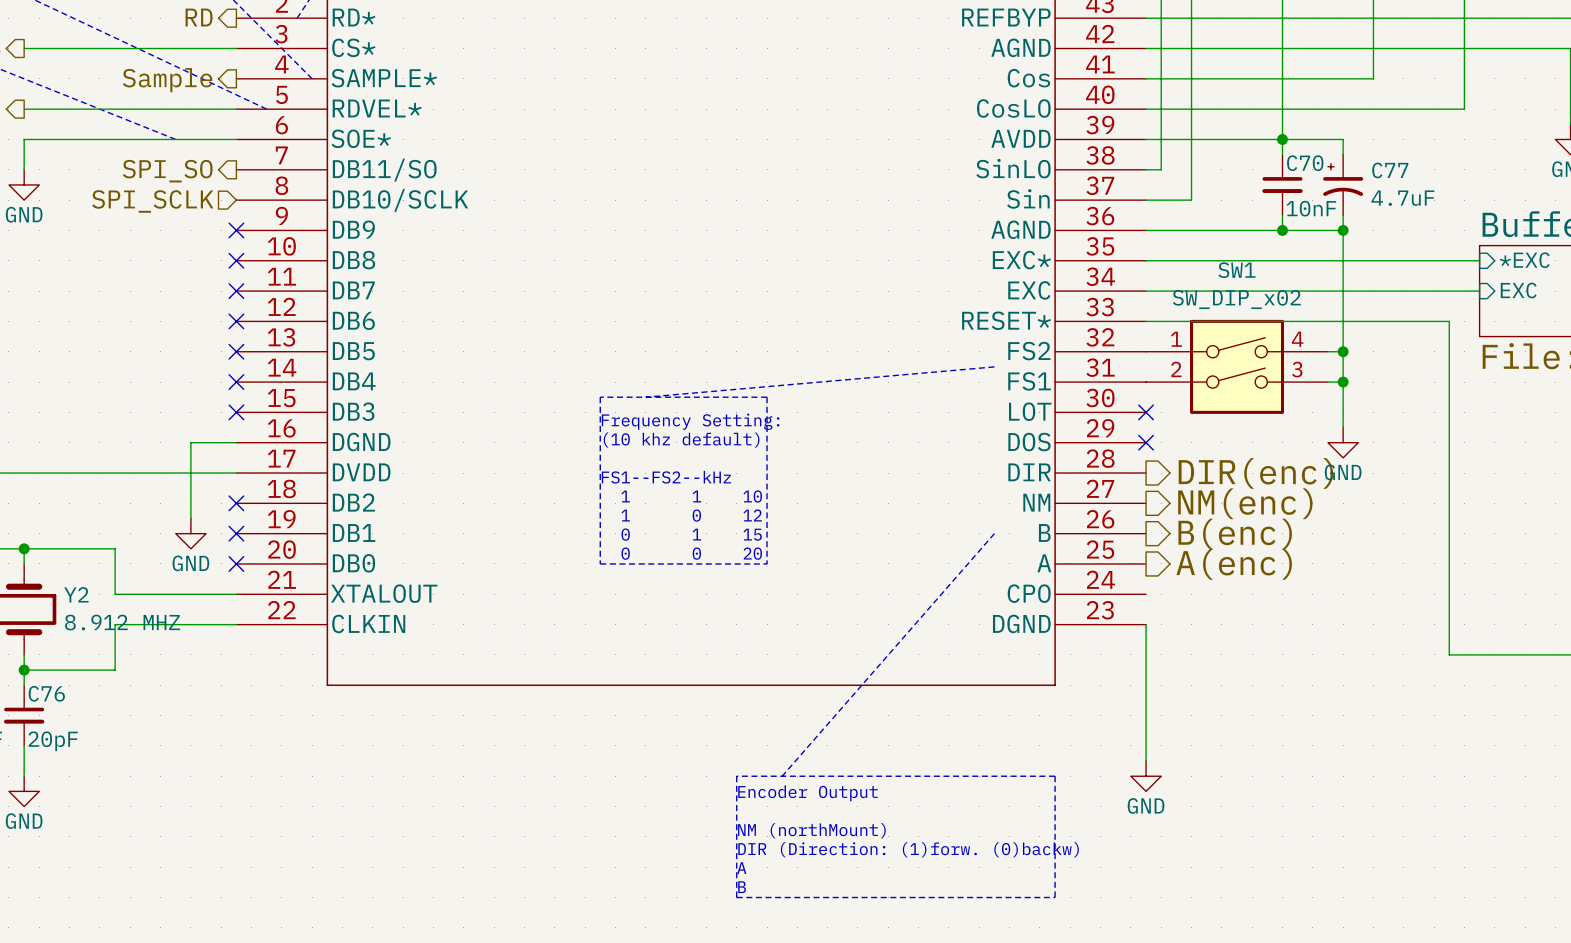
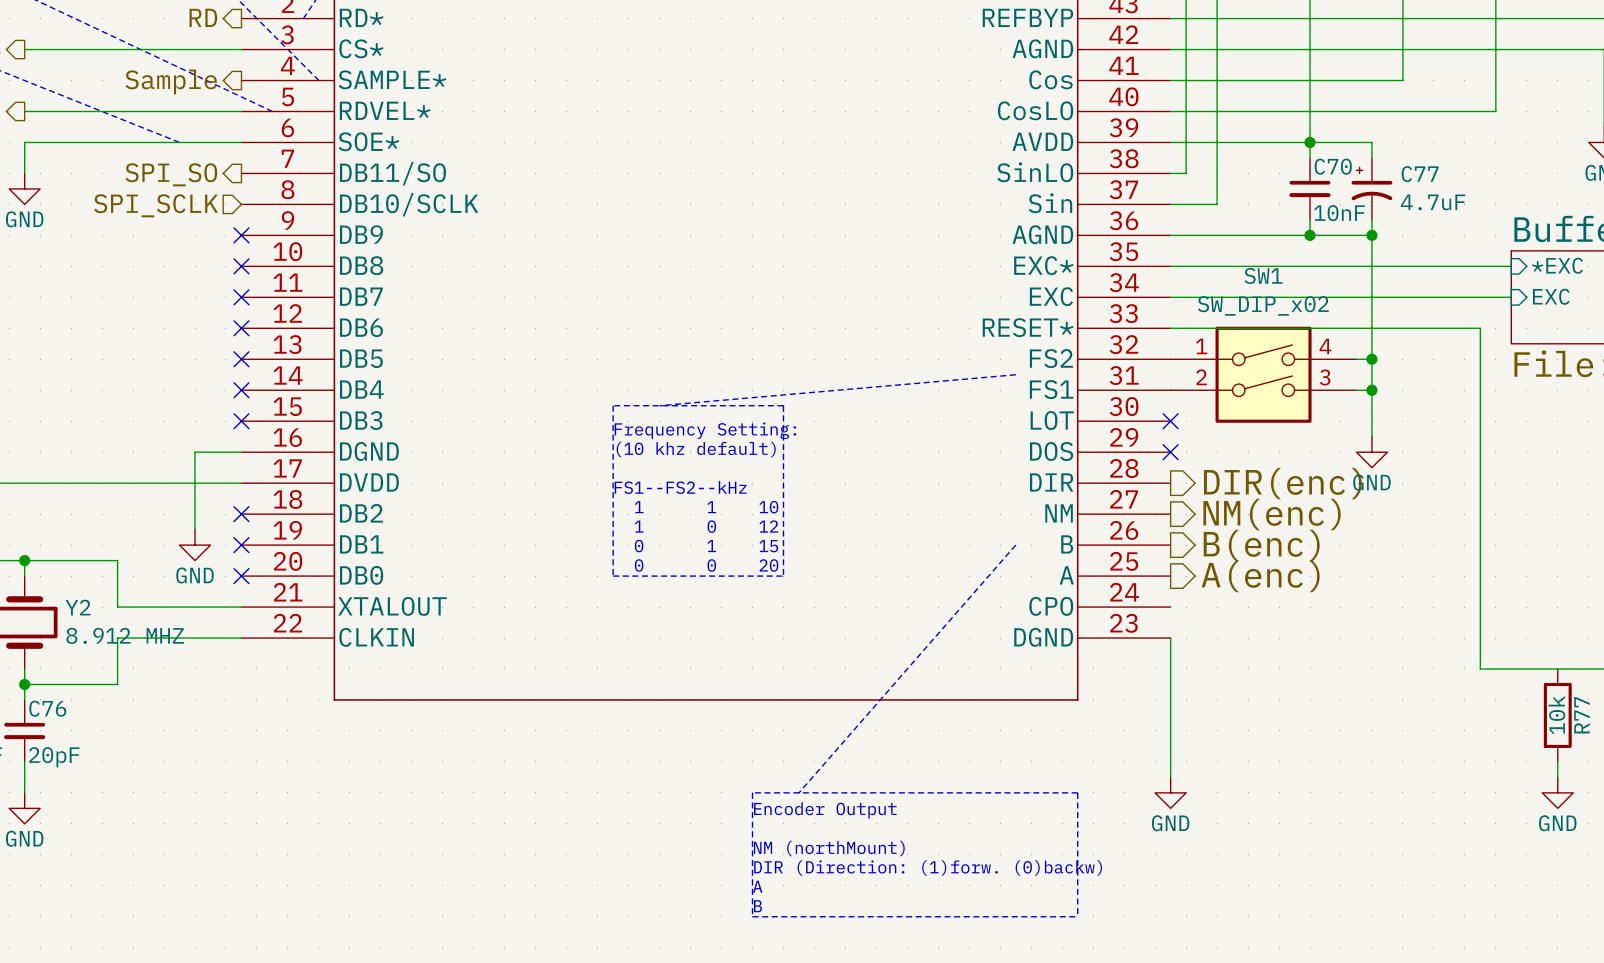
R77: none -> 10k (1557, 715)
wire: none -> (1557, 761) (1557, 777)
power symbol: none -> GND (1557, 792)

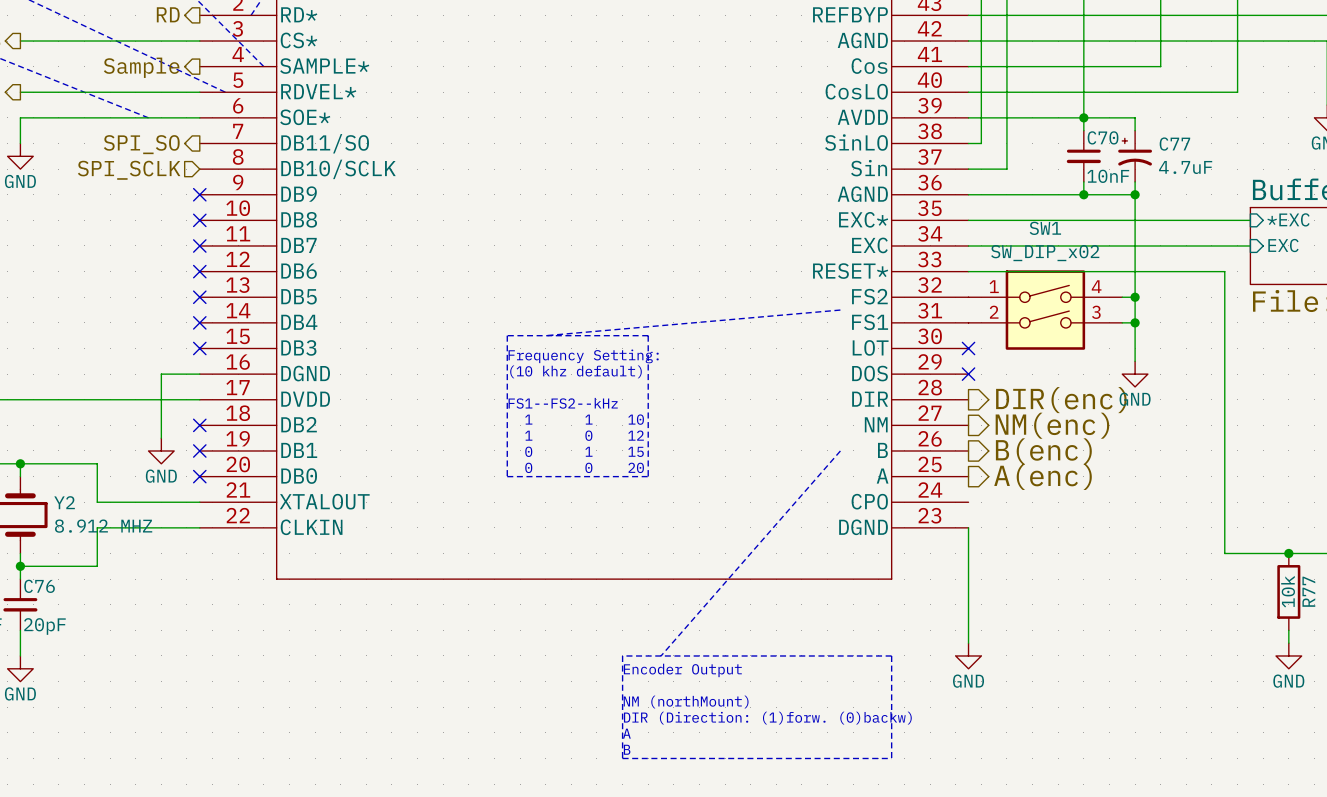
junction: none -> (1288, 553)

